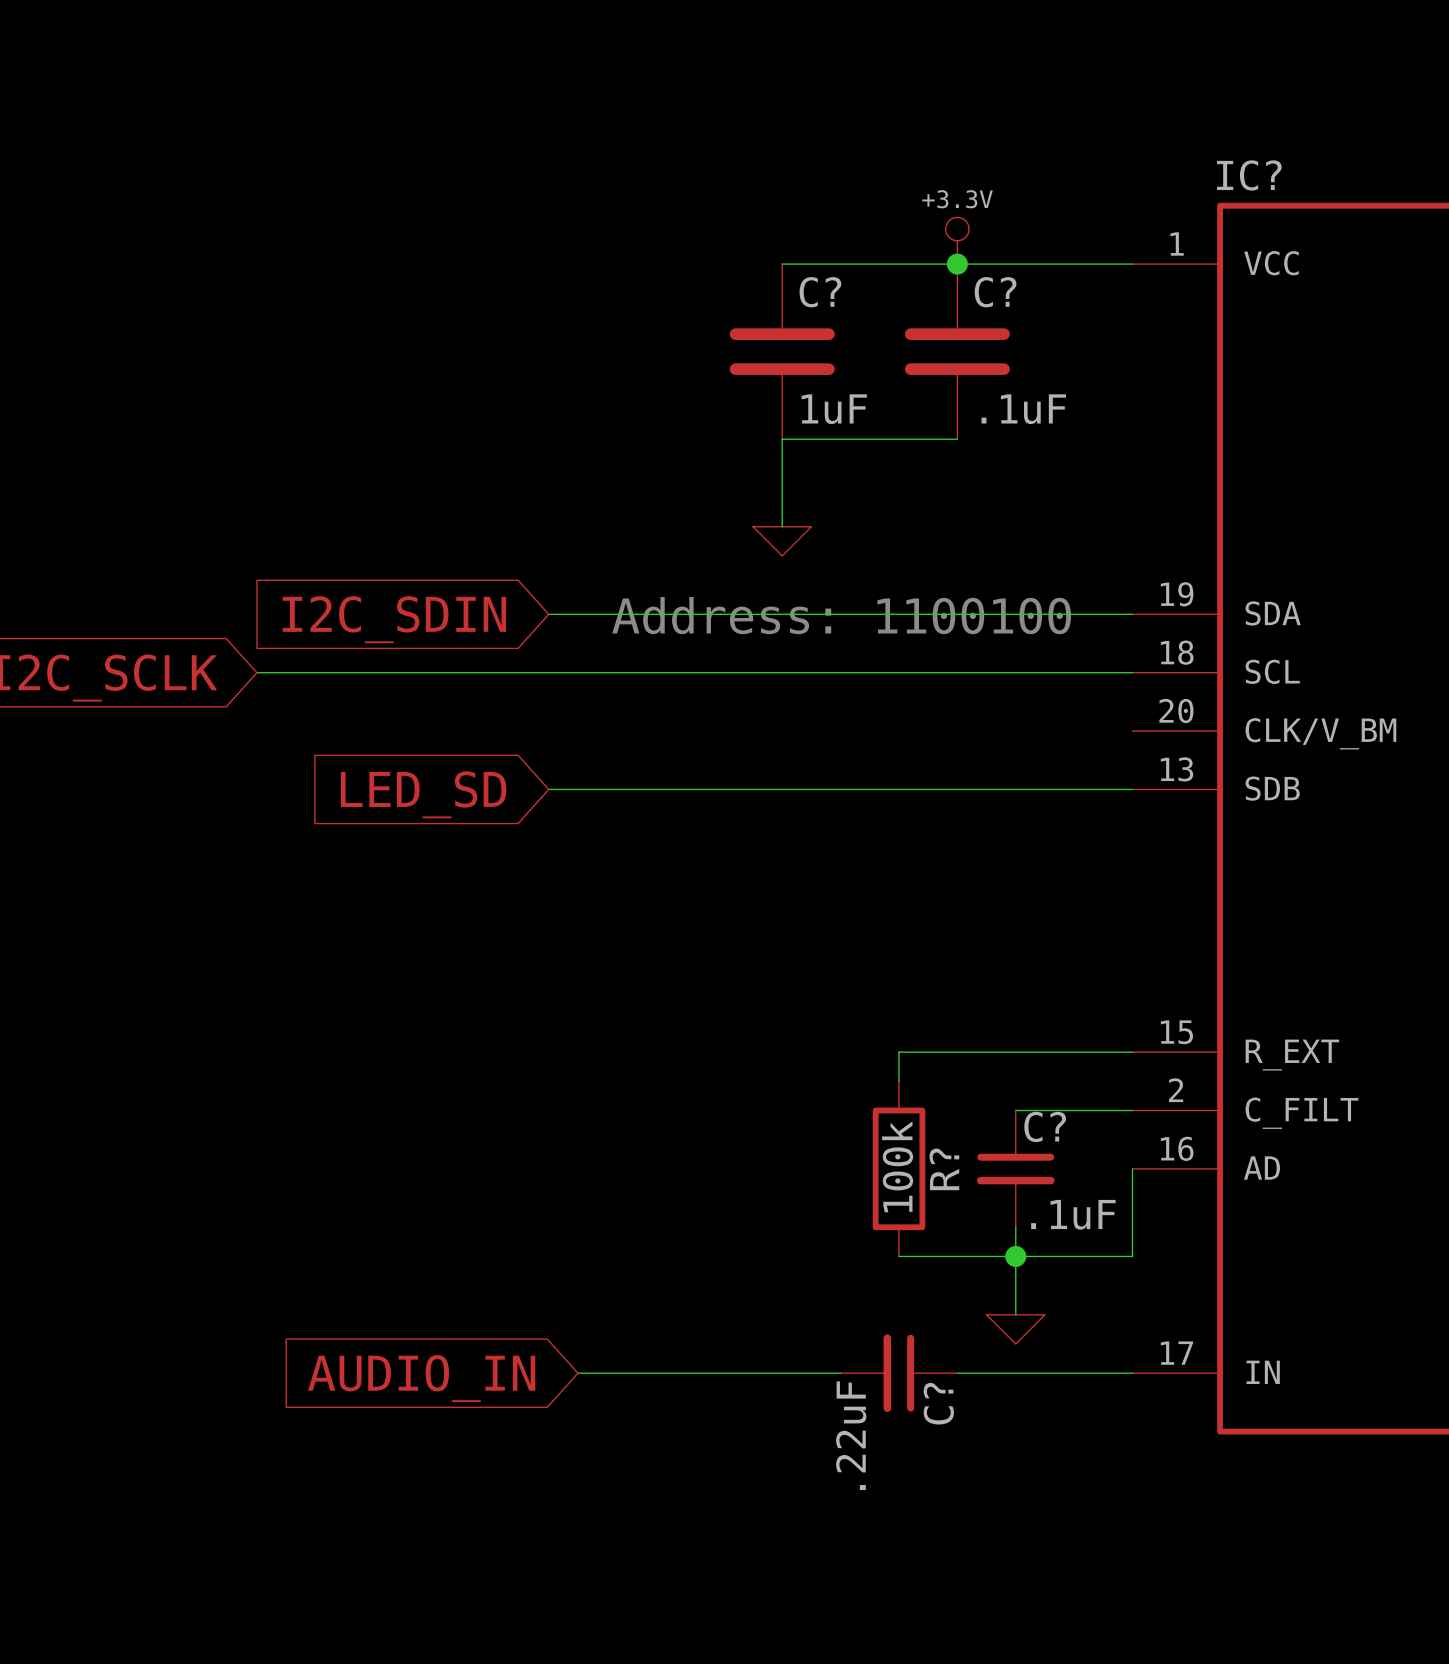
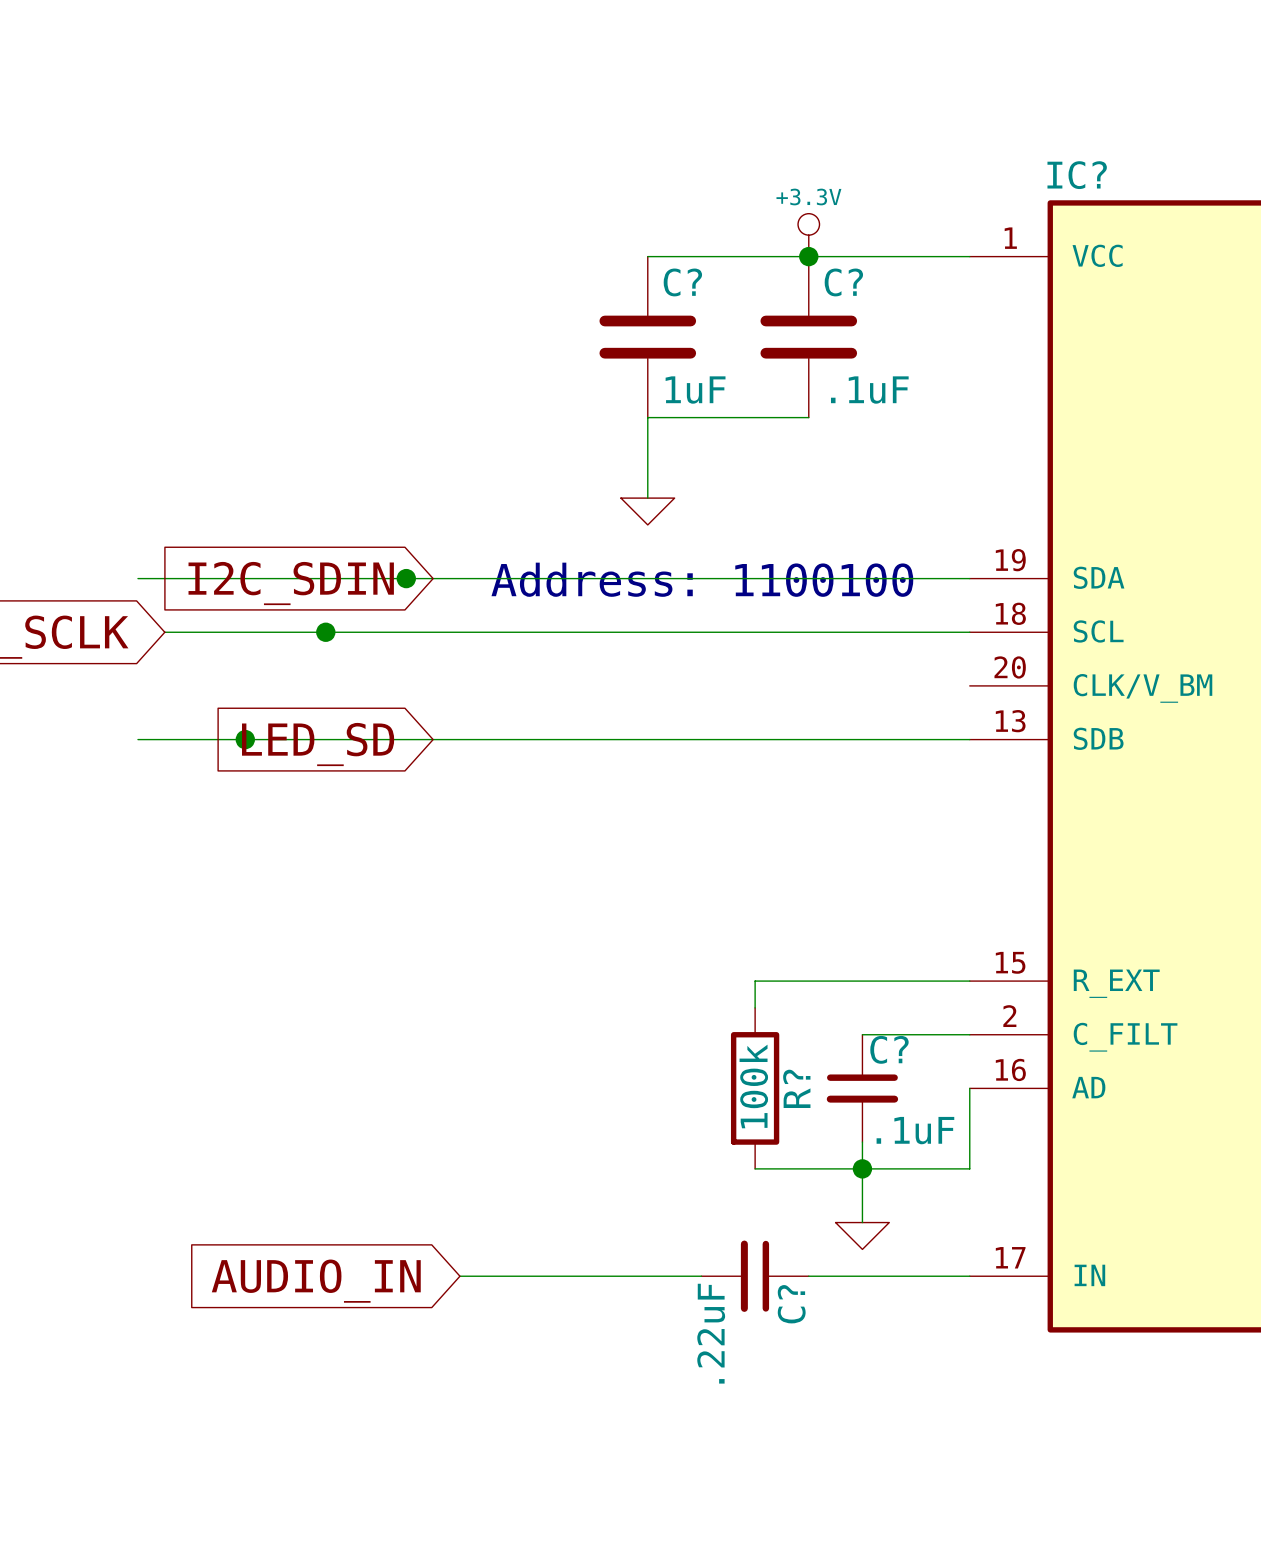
wire: none -> (137, 578) (433, 578)
junction: none -> (406, 578)
junction: none -> (325, 632)
wire: none -> (137, 739) (433, 739)
junction: none -> (245, 739)

